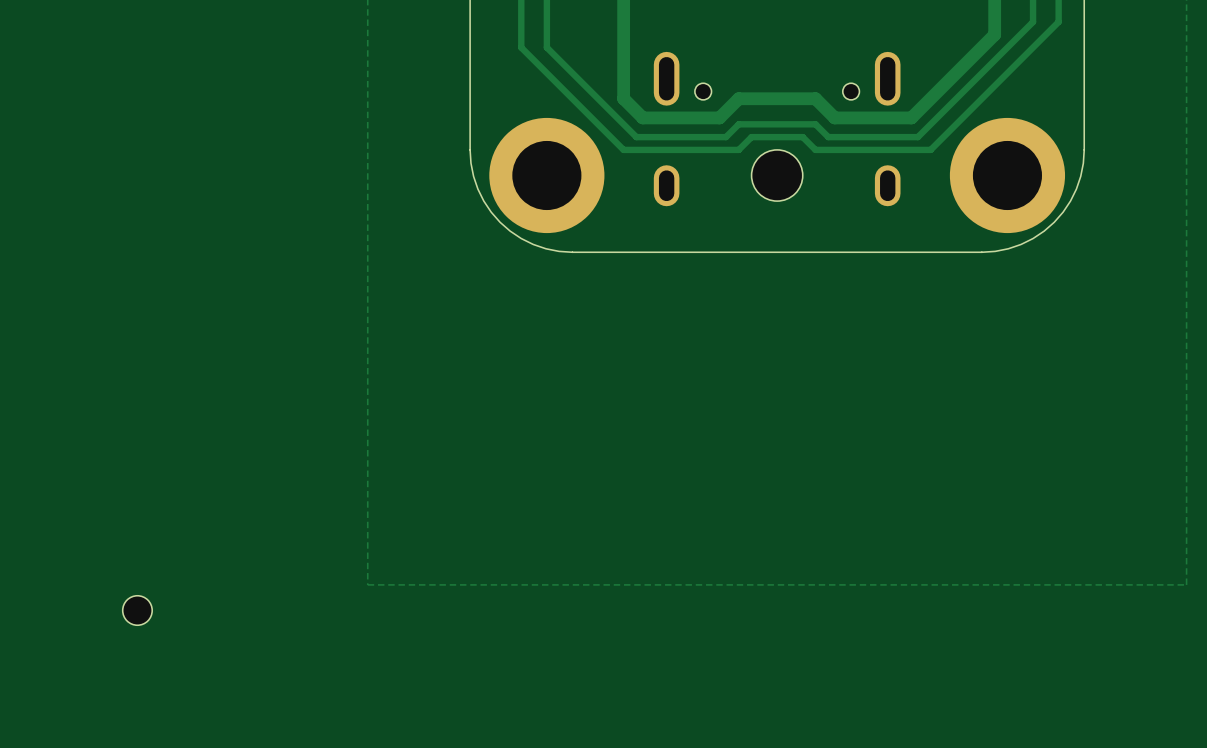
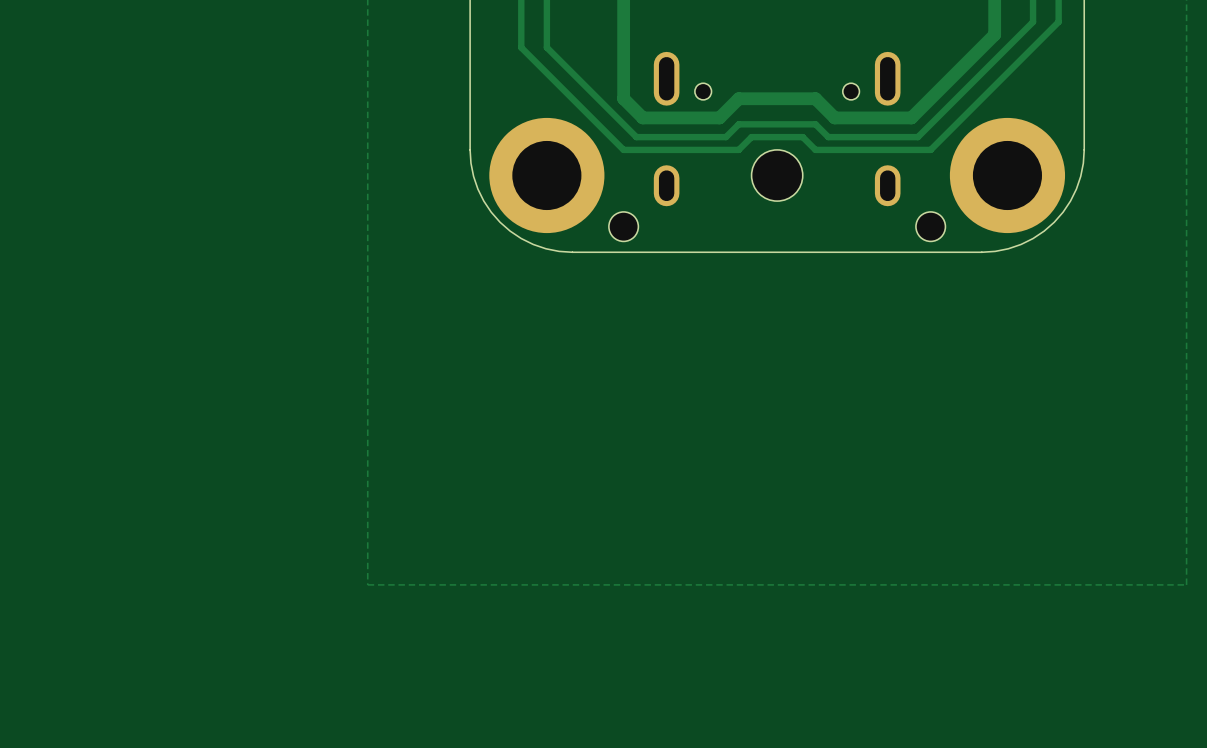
part: none -> (623, 226)
part: none -> (930, 226)
part: (137, 610) -> none

